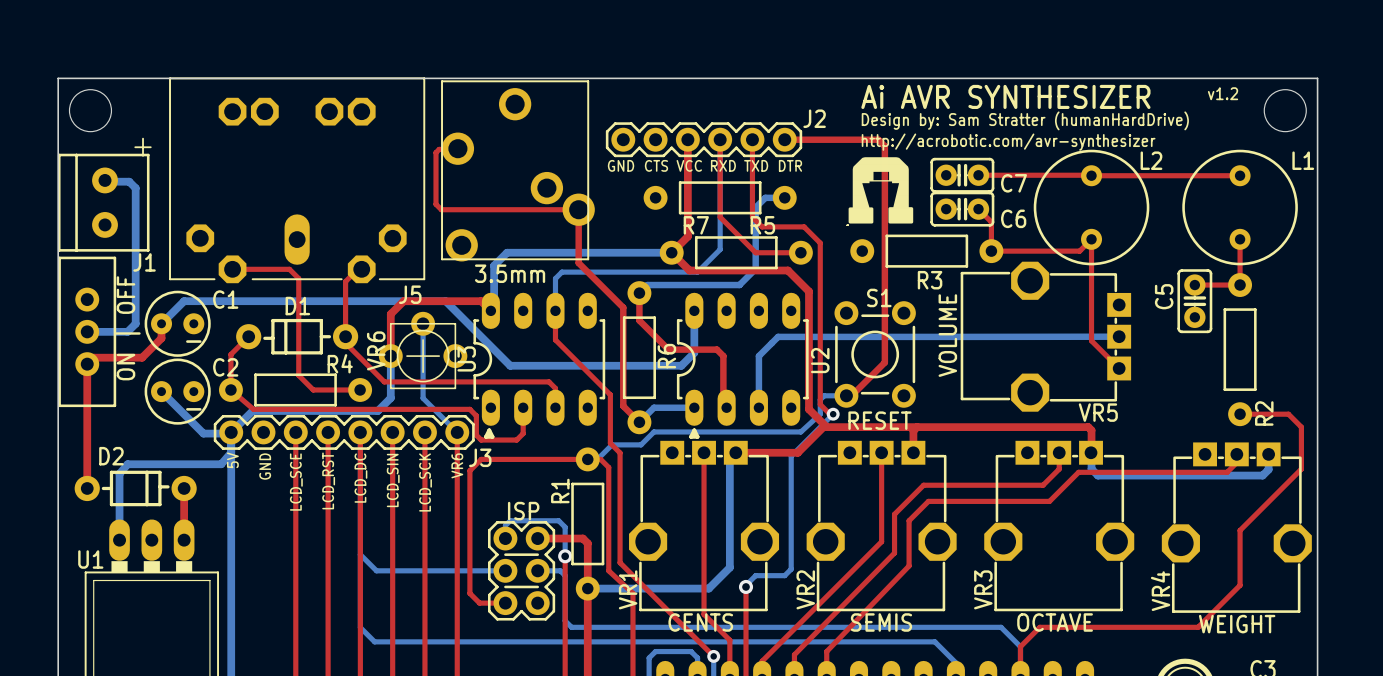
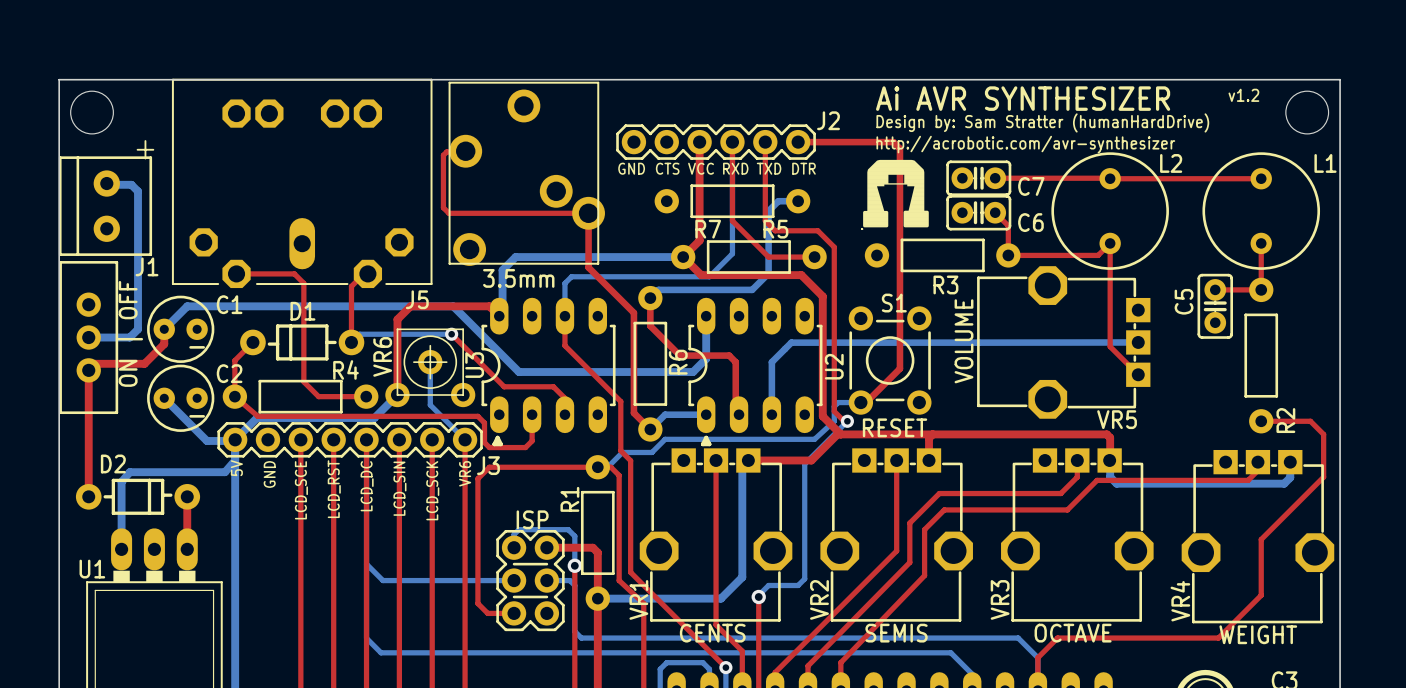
VR6 footprint: [378, 311, 468, 390] -> [385, 328, 476, 408]
bottom track: (423, 323) (423, 356) -> none
bottom track: none -> (451, 334) (359, 334) (351, 342)
via: none -> (451, 334)
top track: (345, 336) (345, 343) (384, 381) (549, 381) (555, 388) (555, 391) -> (451, 334) (504, 386) (553, 386) (564, 398)
bottom track: (390, 356) (390, 398) (377, 410) (368, 410) -> (397, 395) (374, 417)
top track: none -> (397, 362) (397, 395)

